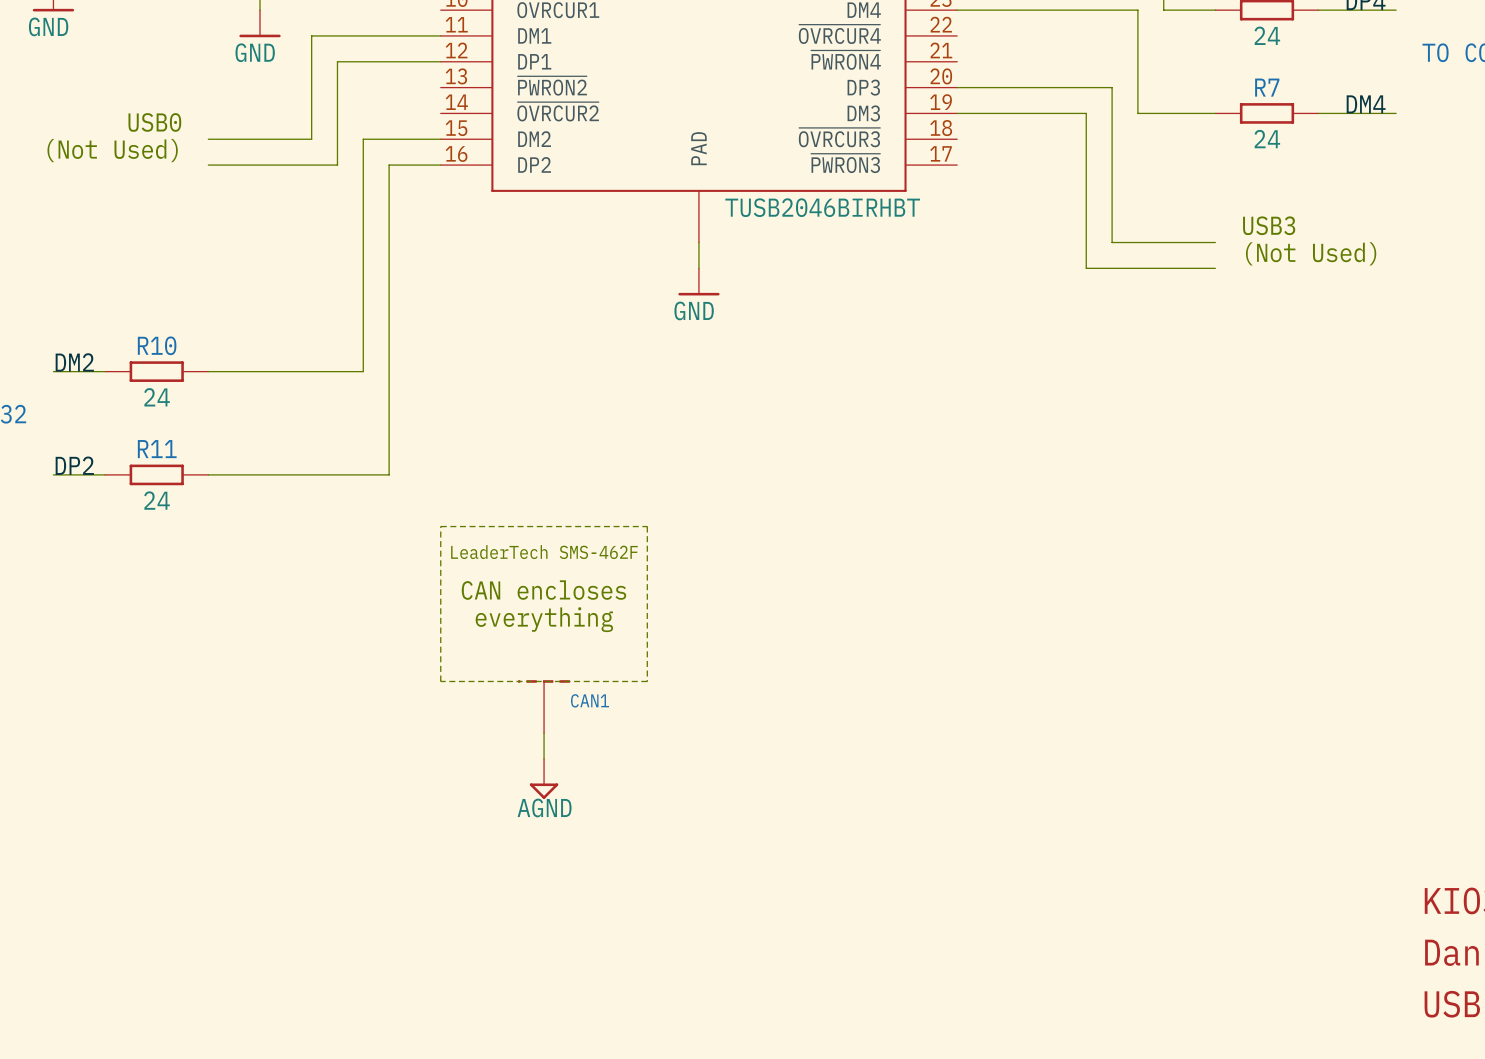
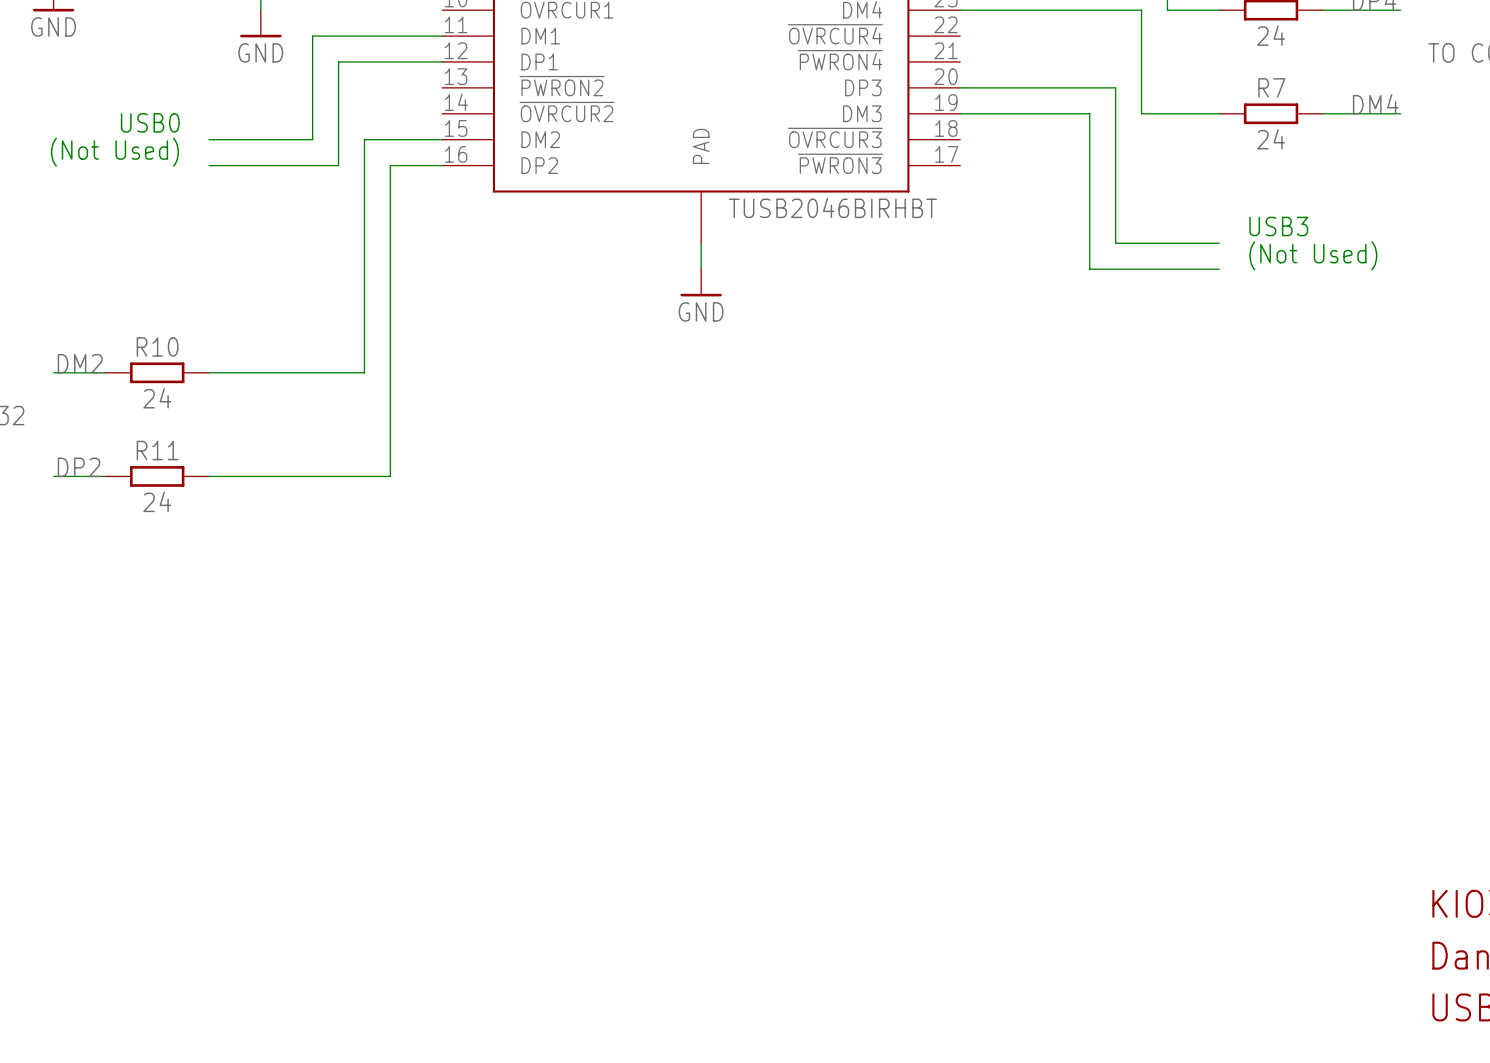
wire: (440, 526) (440, 681) (647, 681) (647, 526) (440, 526) -> none
text: LeaderTech SMS-462F (544, 552) -> none
text: CAN encloses (543, 590) -> none
text: everything (544, 619) -> none
CAN1: (544, 706) -> none
wire: (544, 733) (544, 758) -> none
power symbol: AGND (544, 778) -> none

